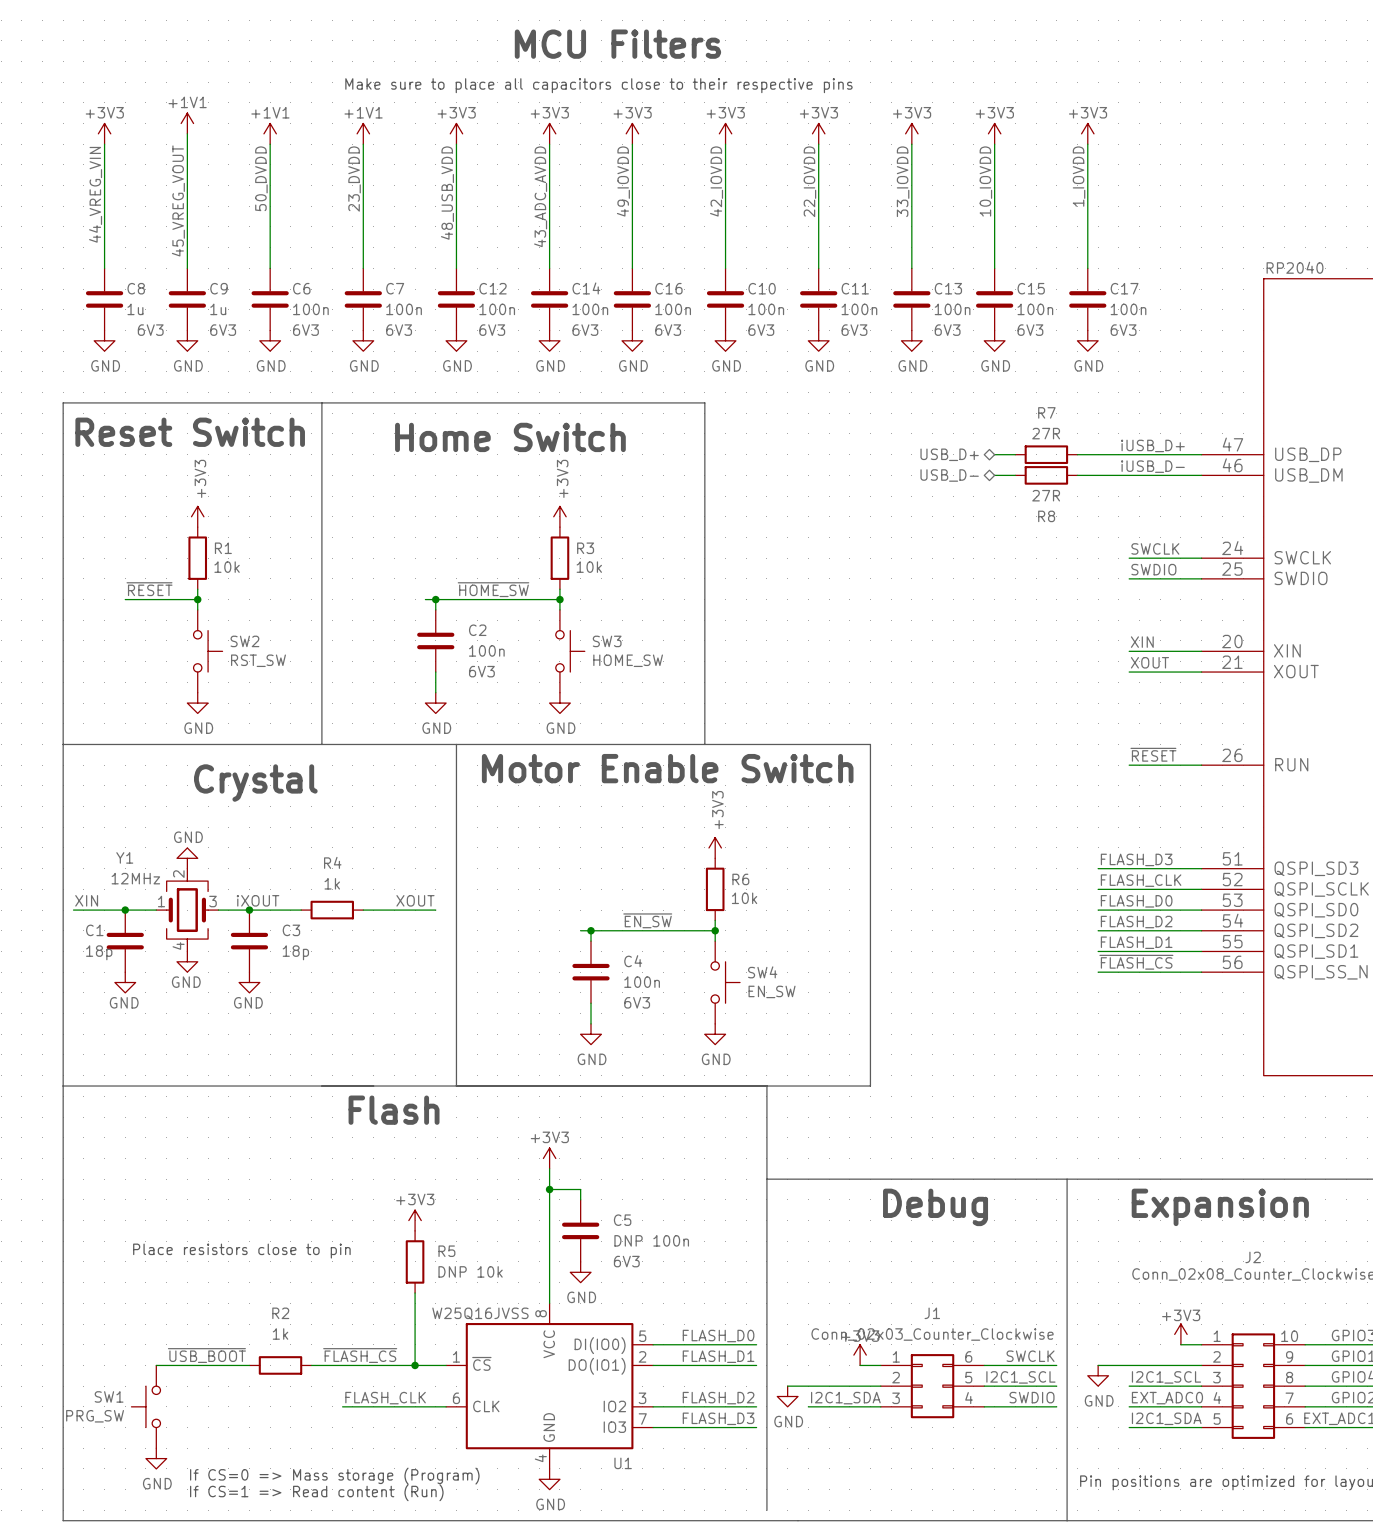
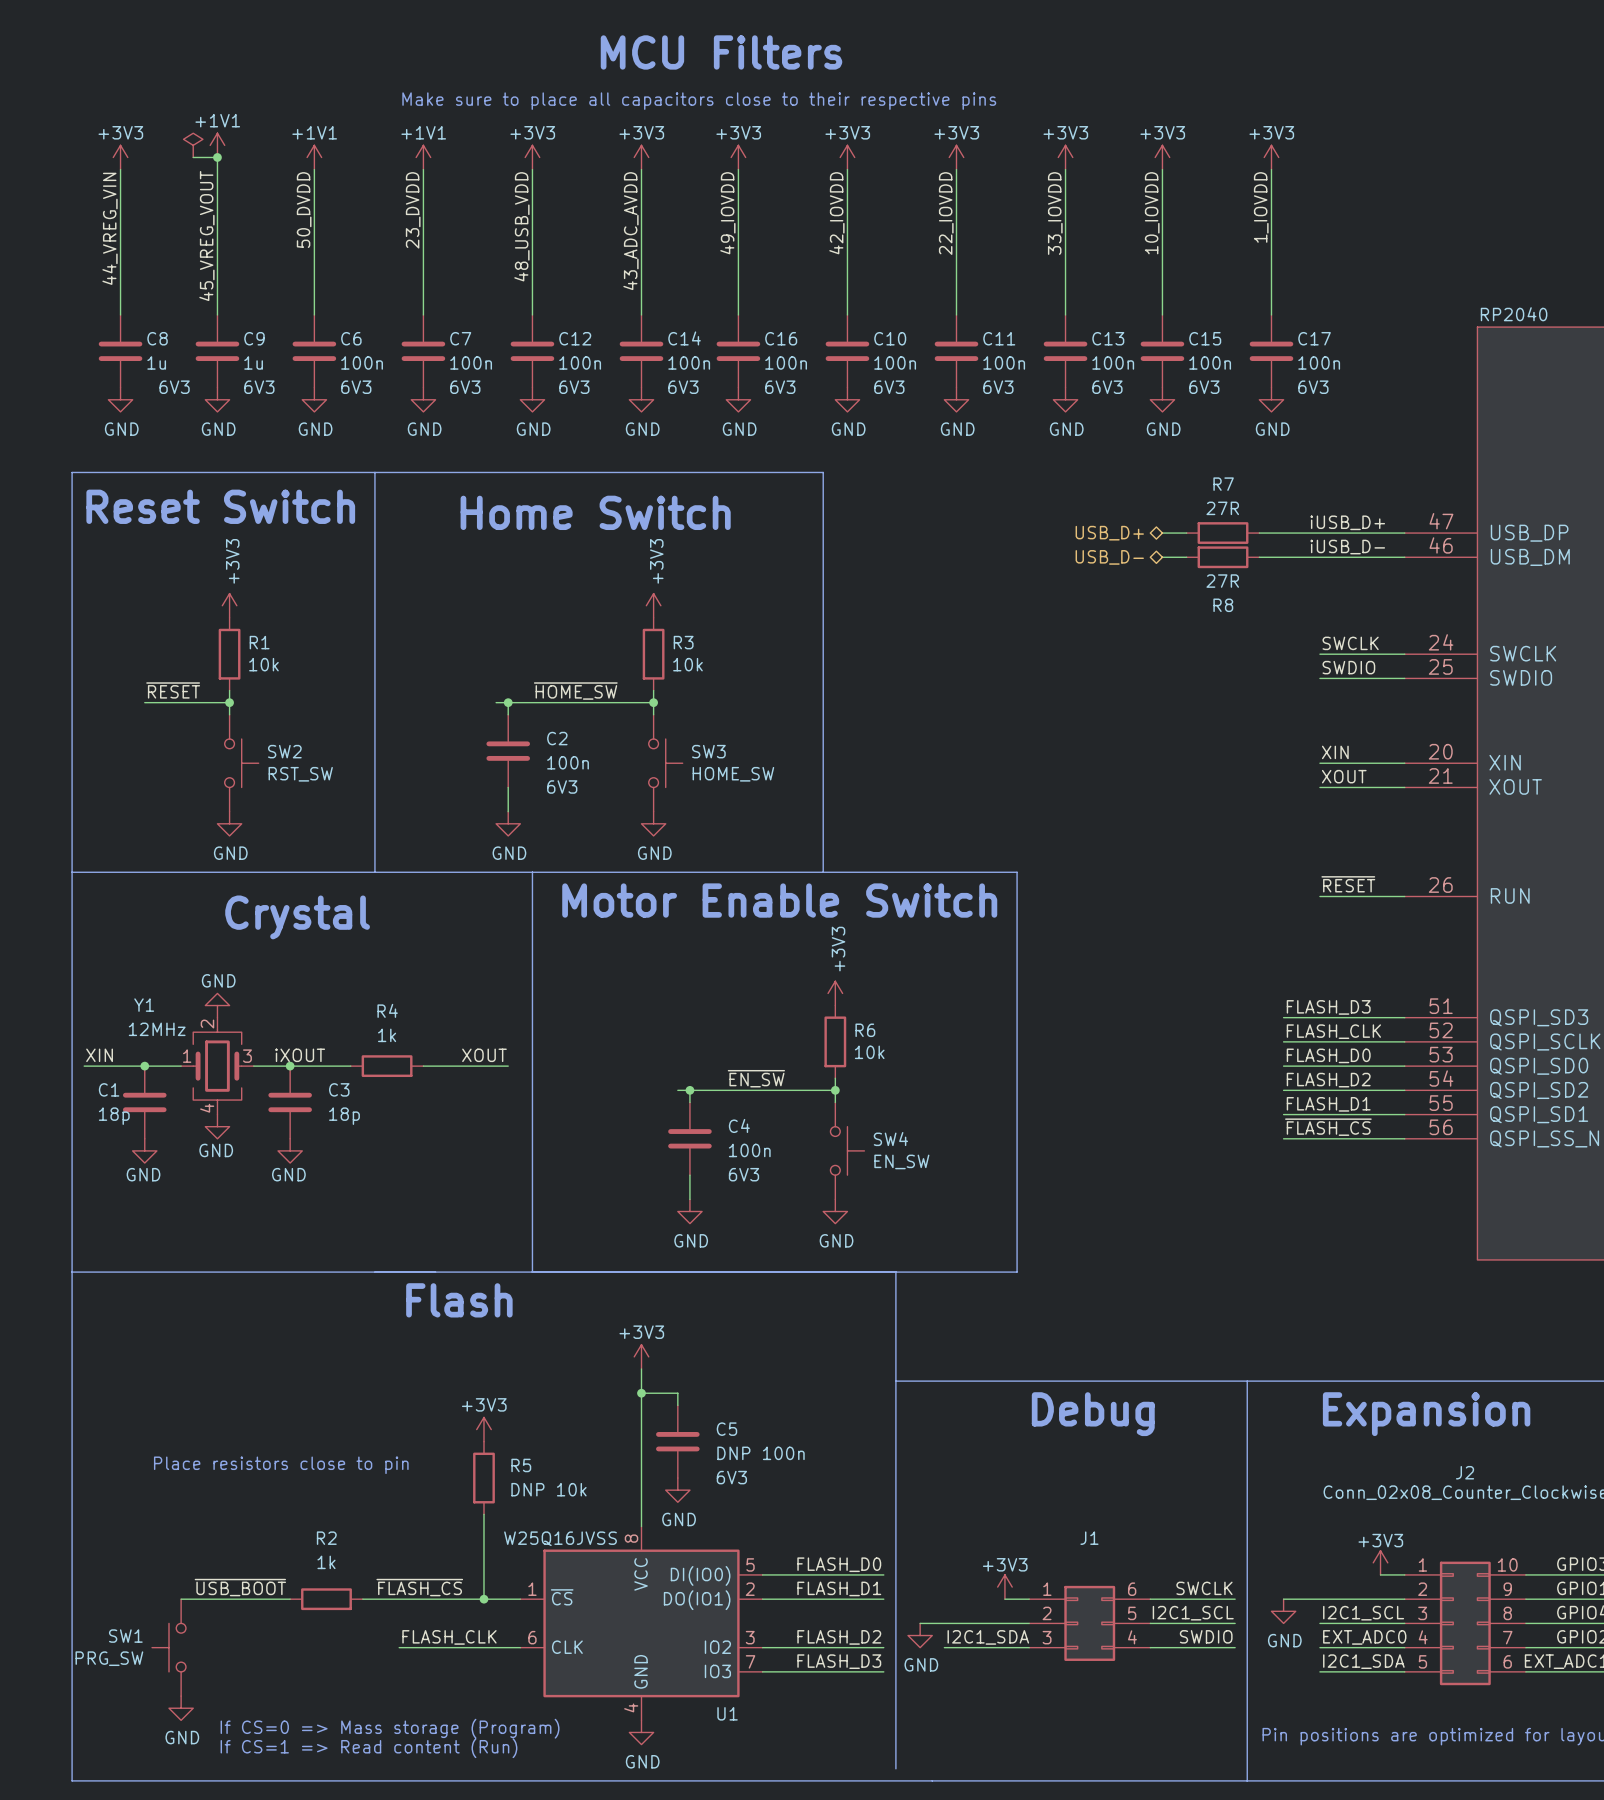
power symbol: none -> (193, 145)
wire: none -> (193, 157) (217, 157)
junction: none -> (217, 157)
J1 value: Conn_02x03_Counter_Clockwise (932, 1334) -> none

